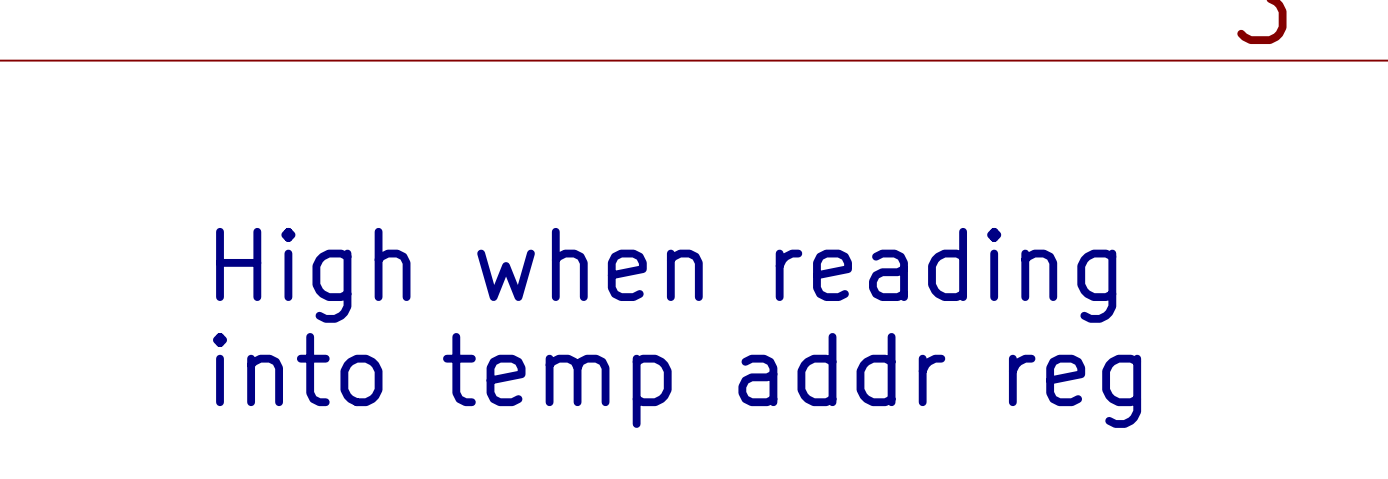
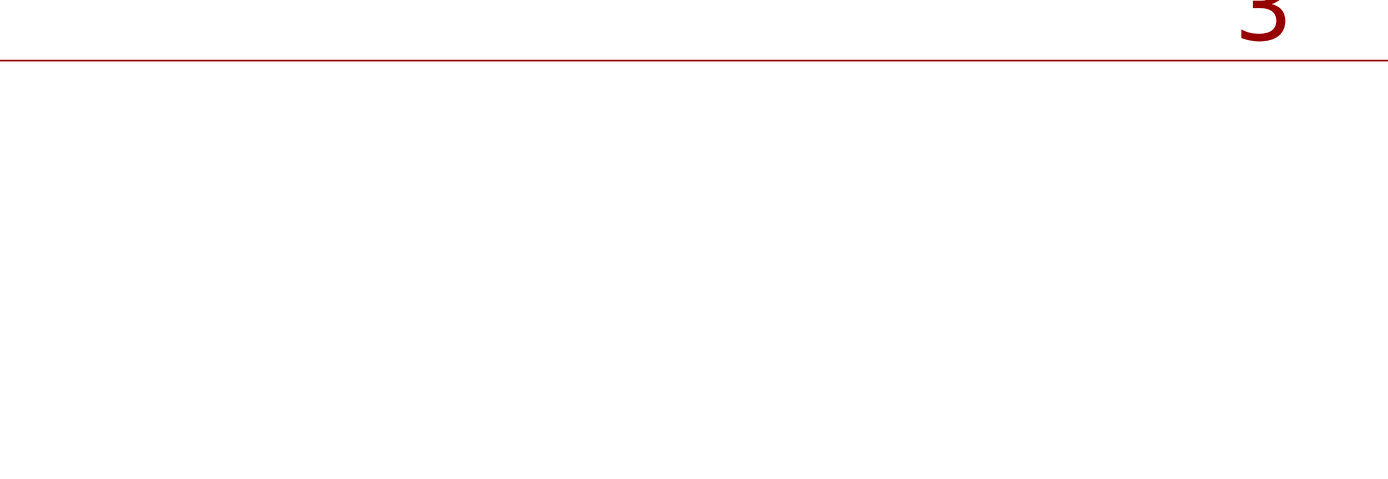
text: High when reading (666, 275) -> none
text: into temp addr reg (677, 380) -> none

